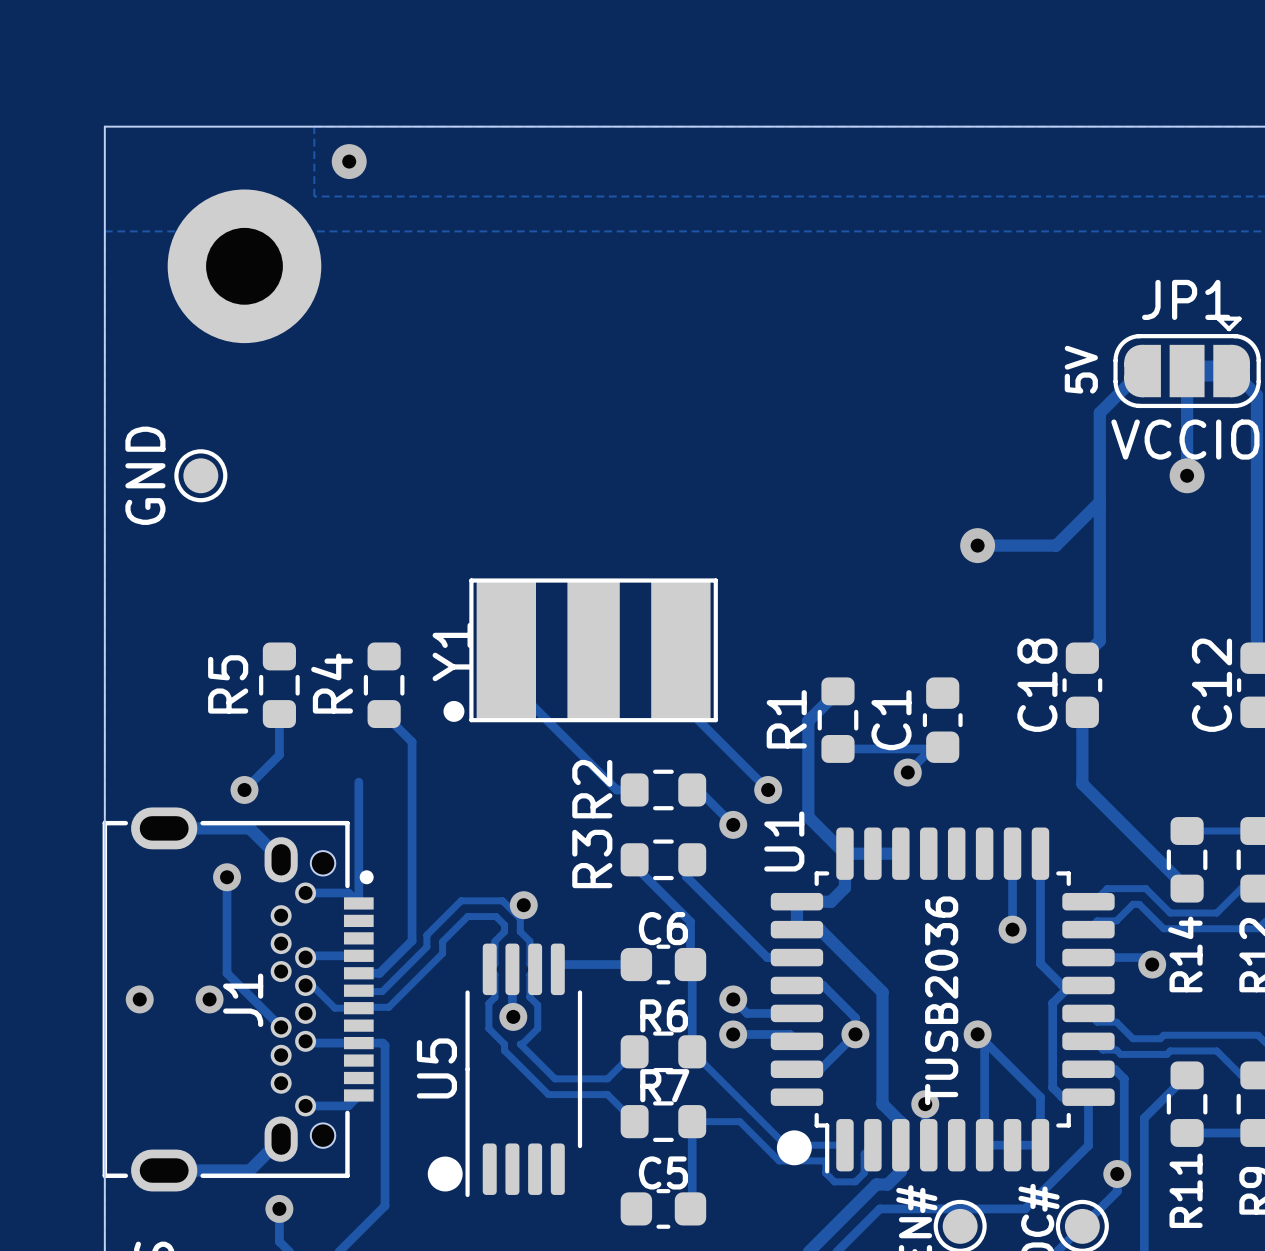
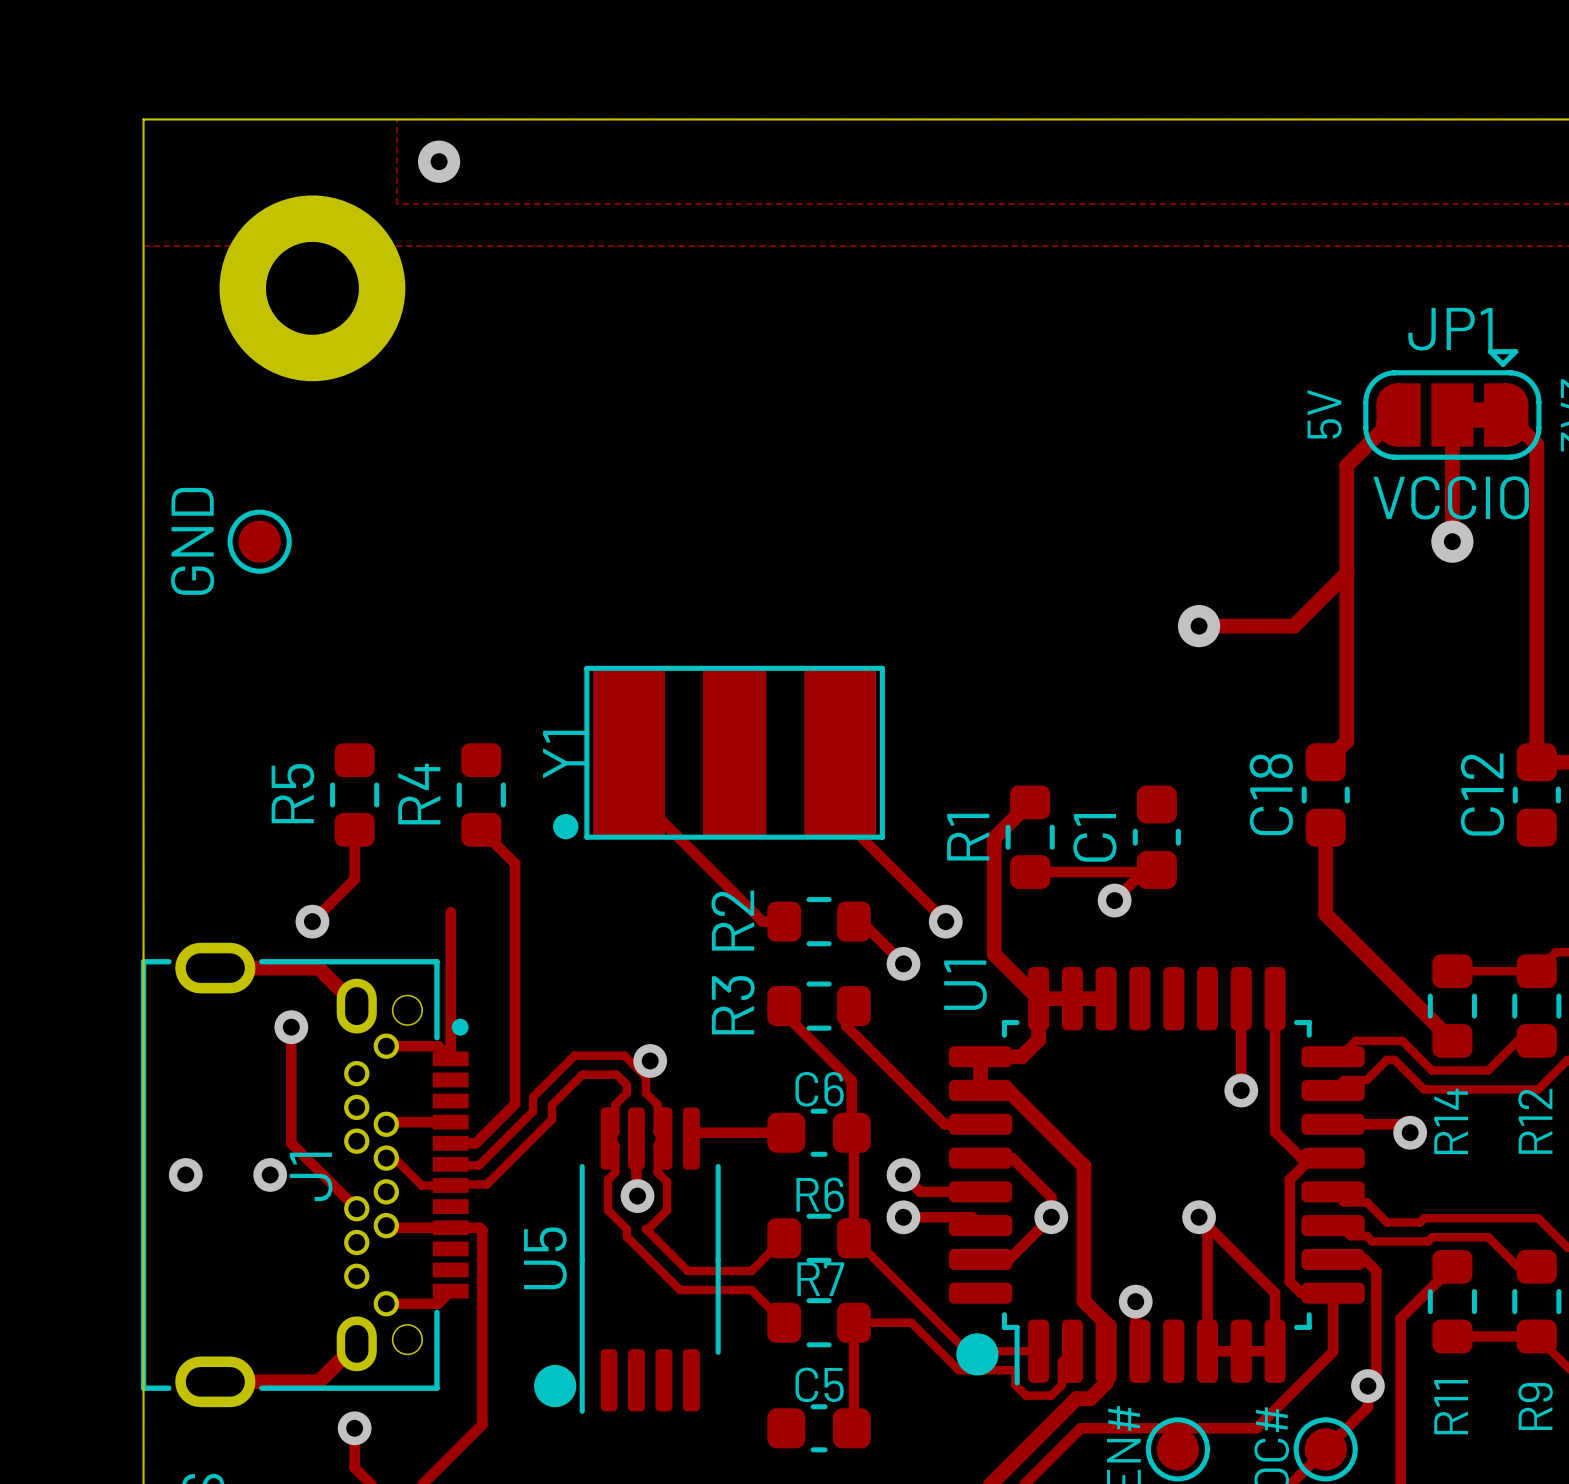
U1 value: TUSB2036 (941, 1000) -> none

